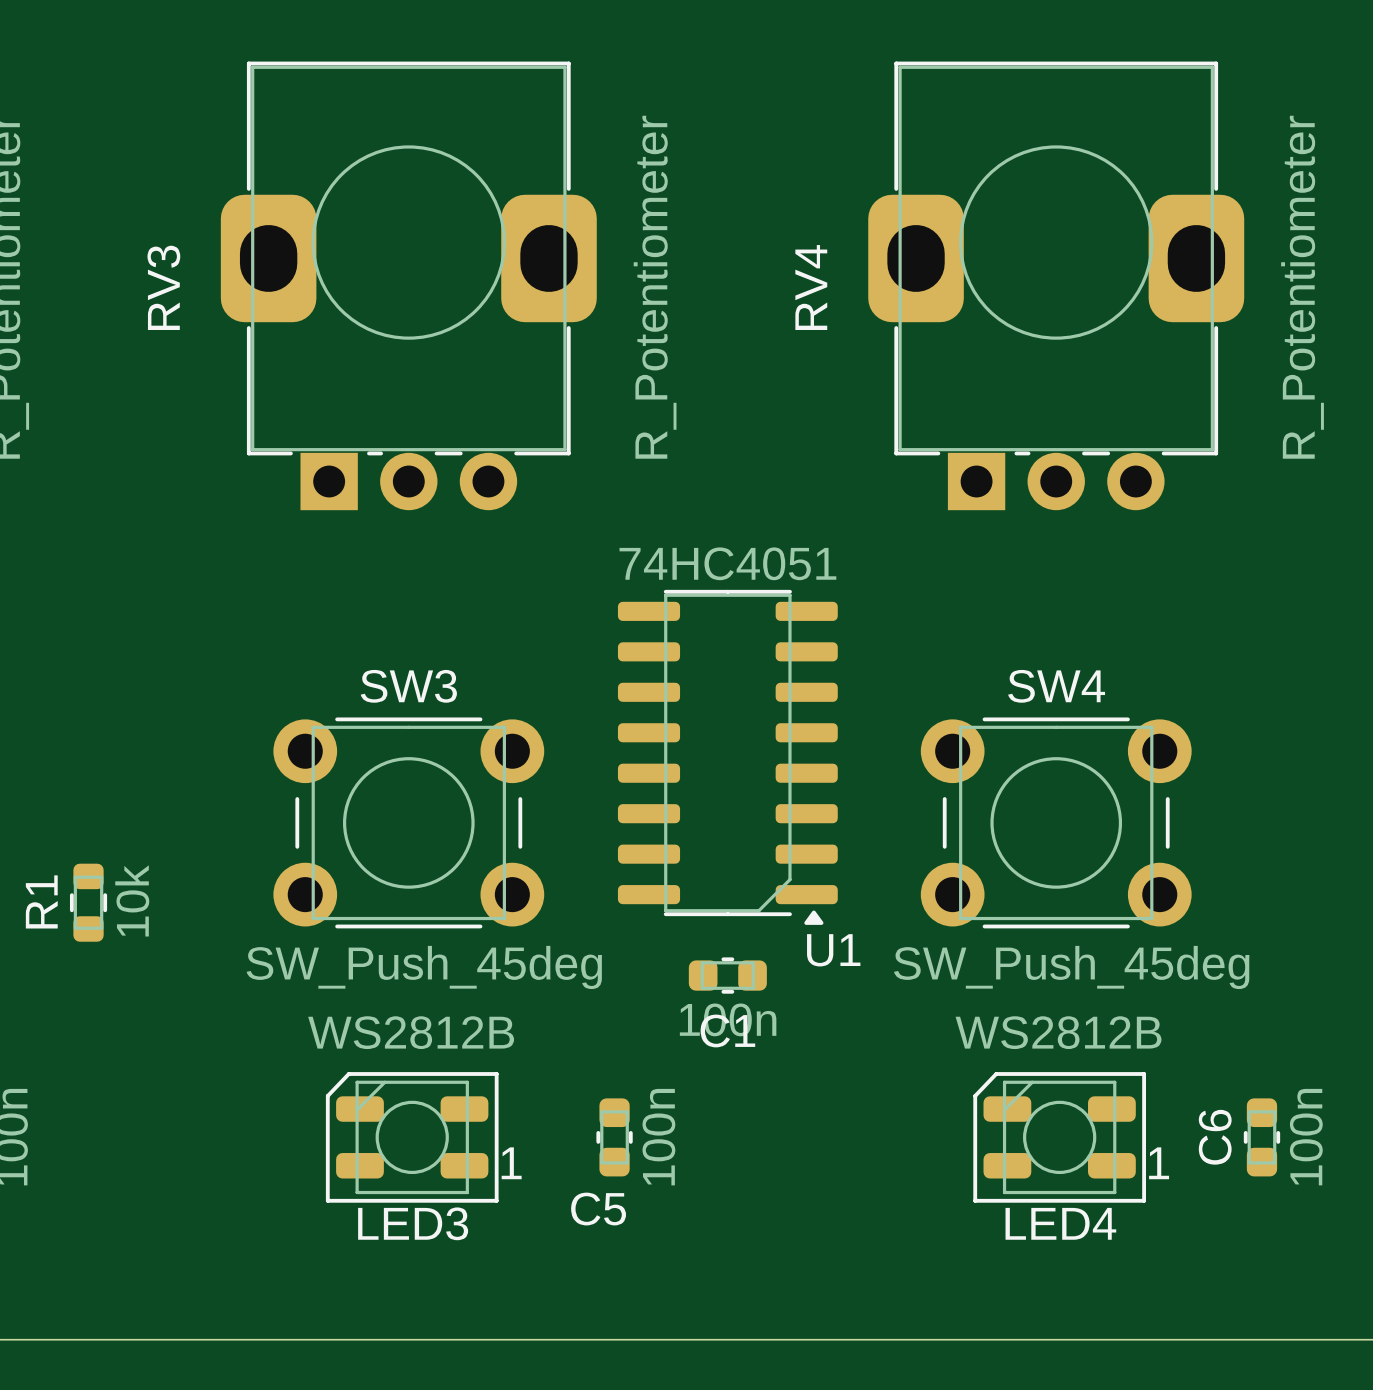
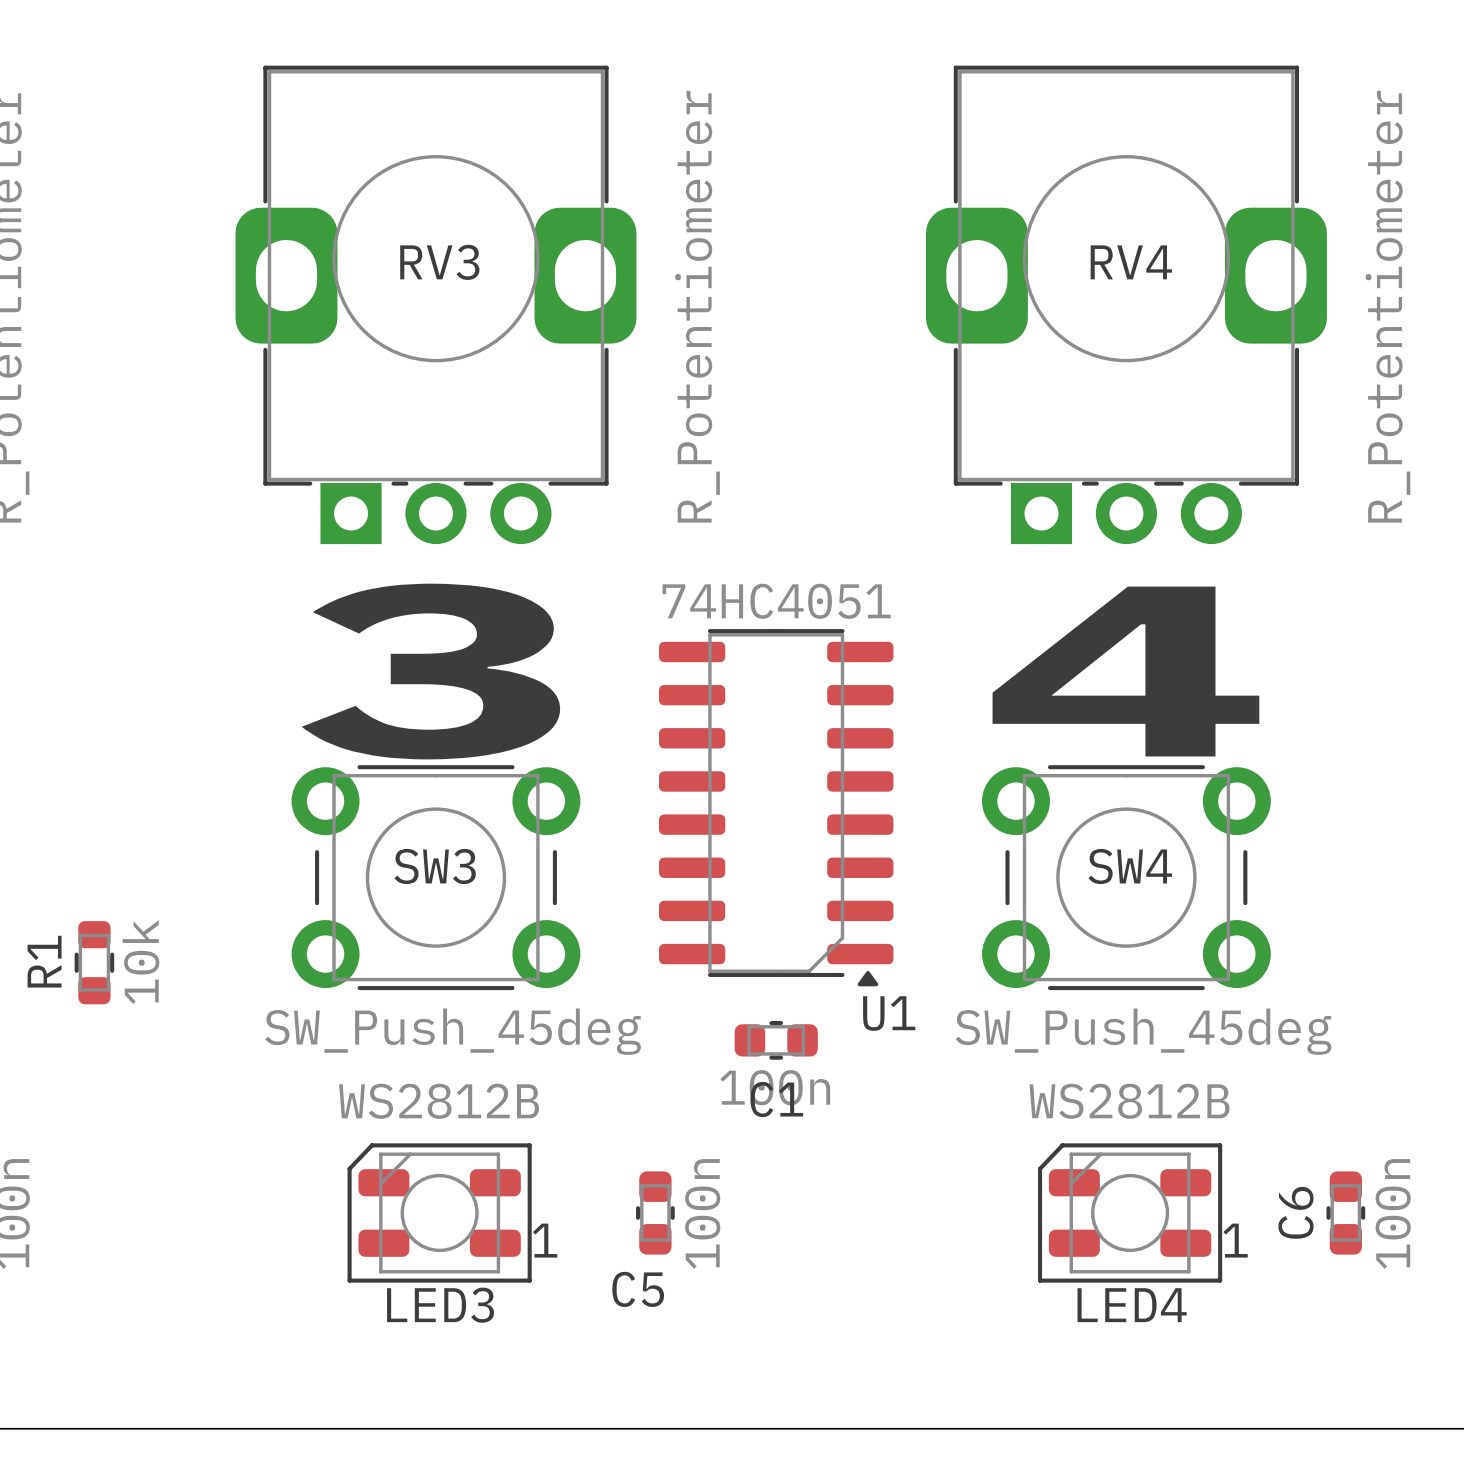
RV3 name rotation: 0° (163, 287) -> 90° clockwise (439, 262)
RV3 name position: RV3 (163, 287) -> RV3 (439, 262)
RV4 name rotation: 0° (811, 287) -> 90° clockwise (1131, 262)
RV4 name position: RV4 (811, 287) -> RV4 (1131, 262)
text: none -> 3 (430, 671)
text: none -> 4 (1125, 671)
SW3 name position: SW3 (408, 686) -> SW3 (435, 866)
SW4 name position: SW4 (1056, 686) -> SW4 (1130, 866)

